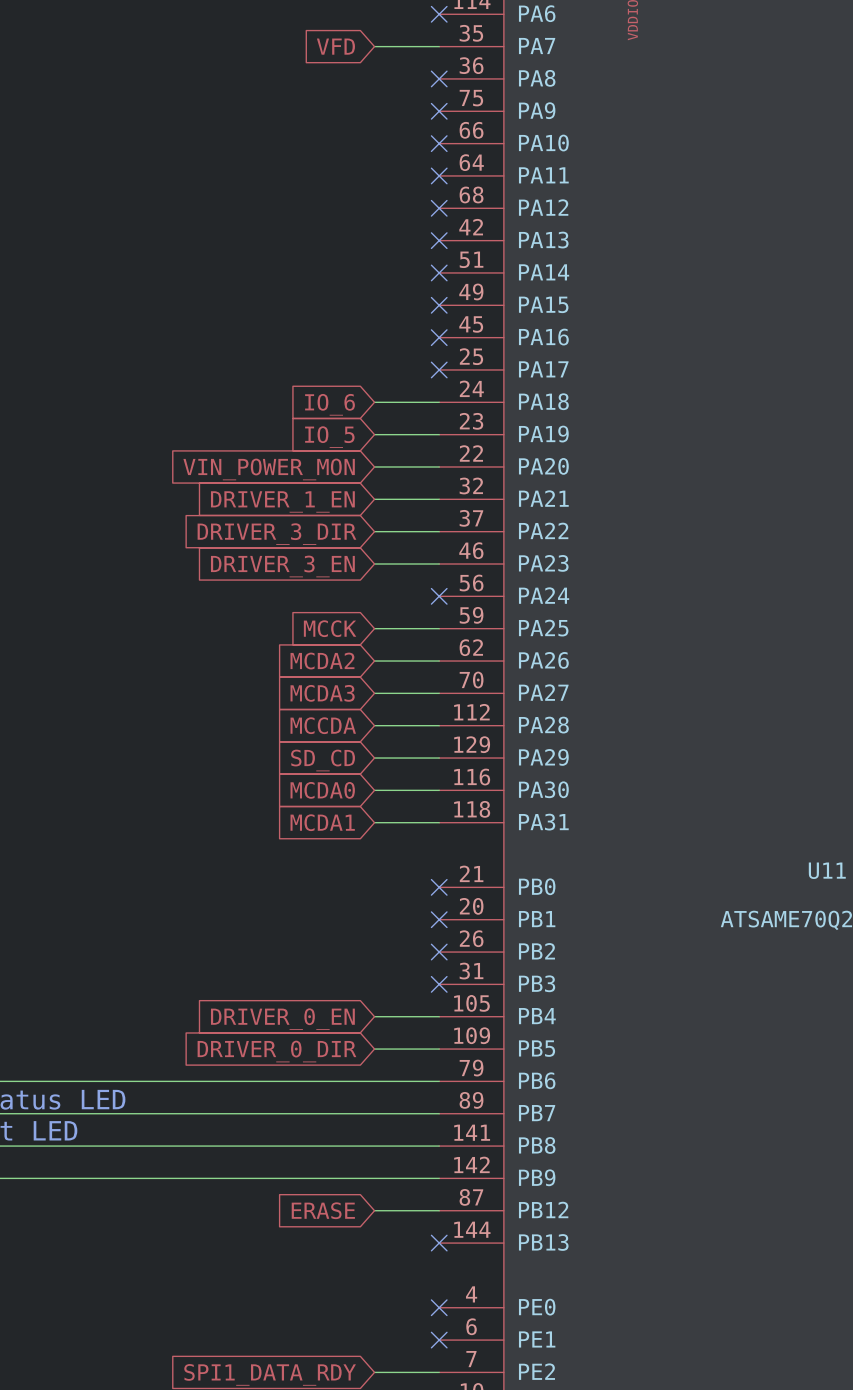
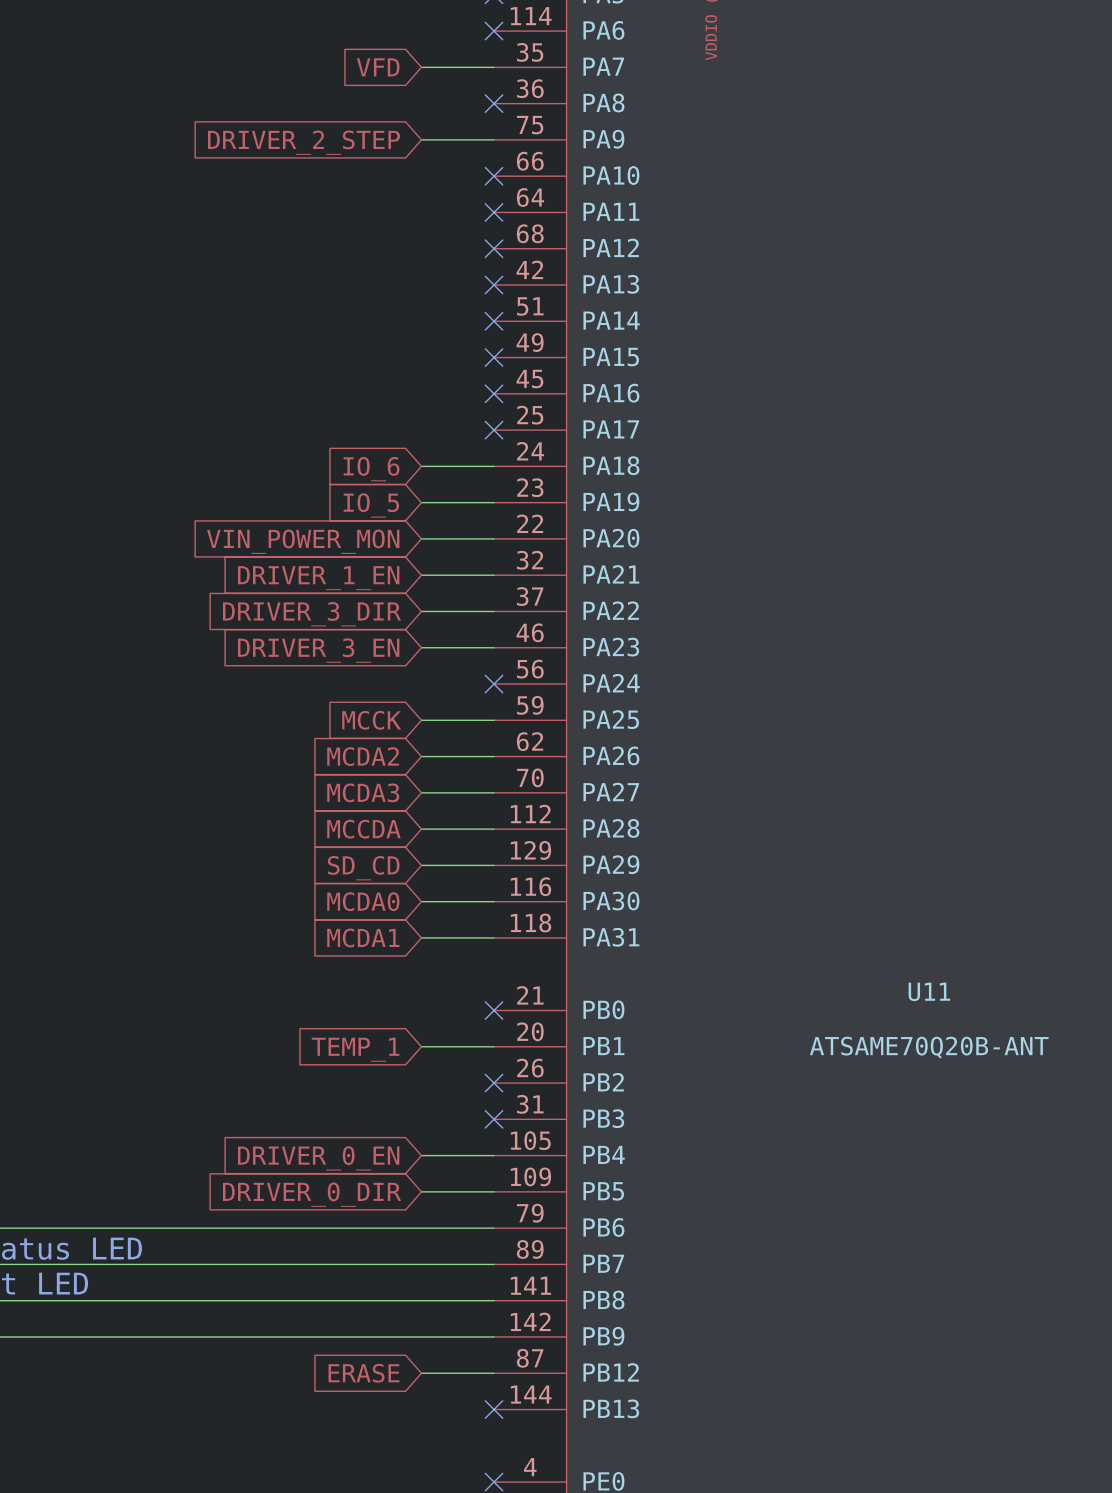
wire: none -> (421, 139) (494, 139)
no-connect mark: (439, 111) -> none
global label: none -> DRIVER_2_STEP (303, 142)
wire: none -> (421, 1046) (494, 1046)
no-connect mark: (439, 919) -> none
global label: none -> TEMP_1 (355, 1049)

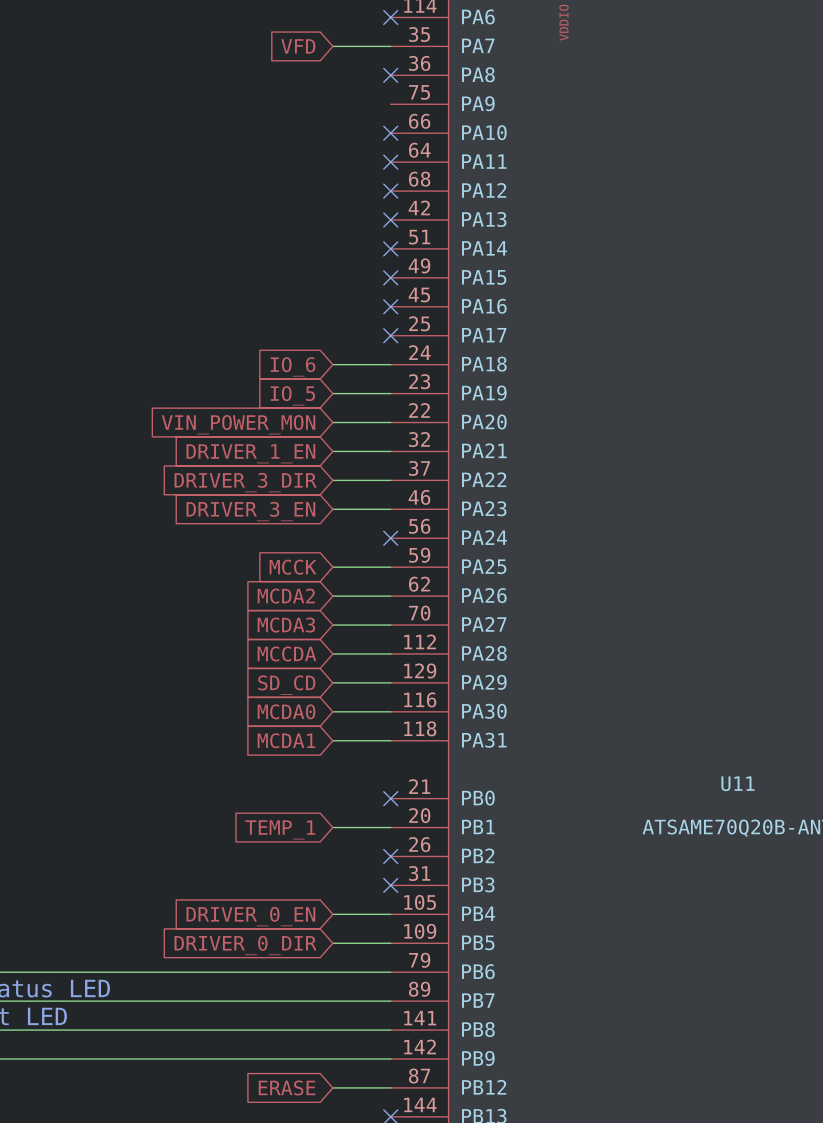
wire: (421, 139) (494, 139) -> none
global label: DRIVER_2_STEP (303, 142) -> none

